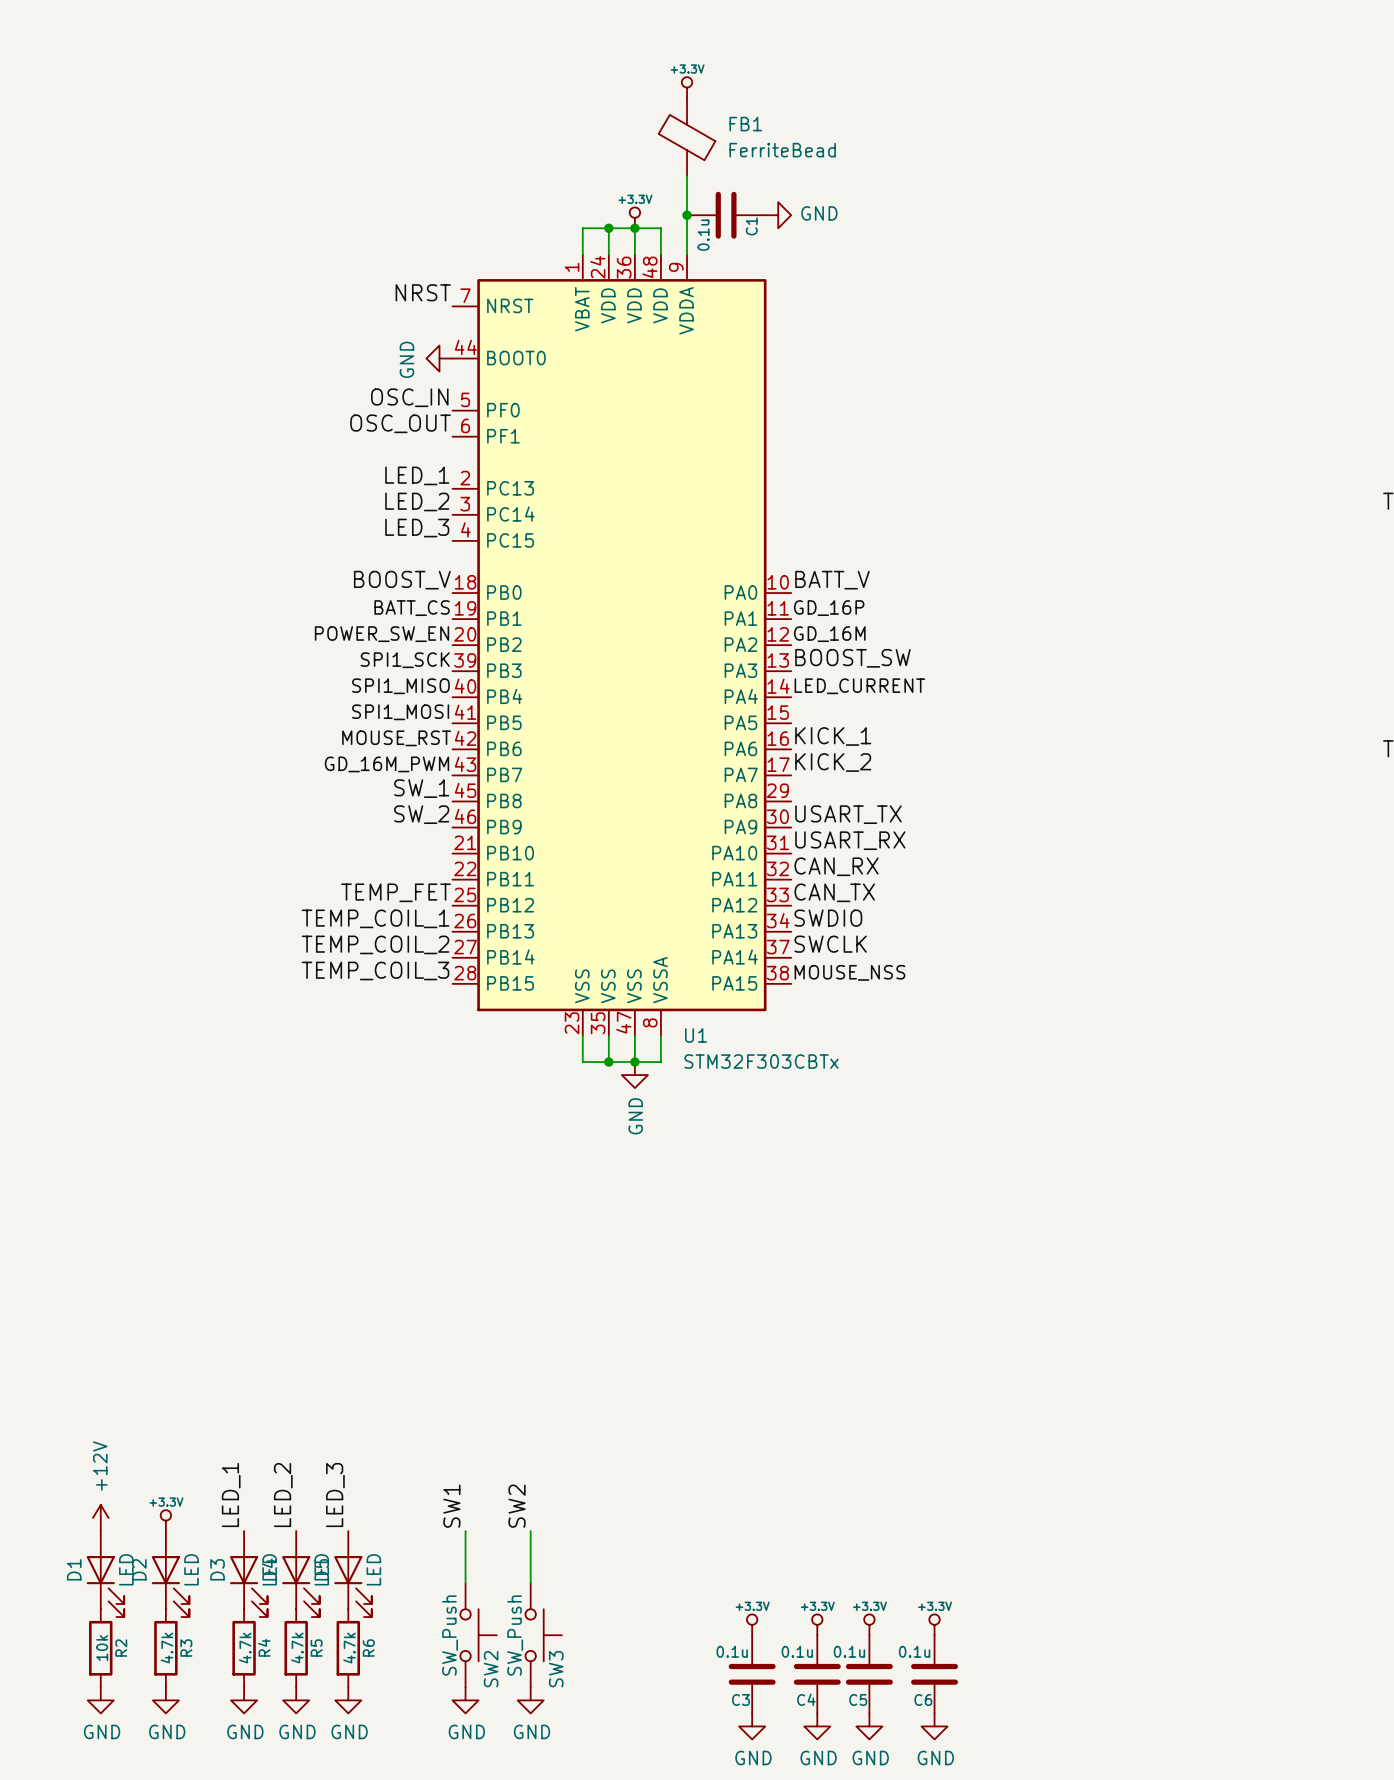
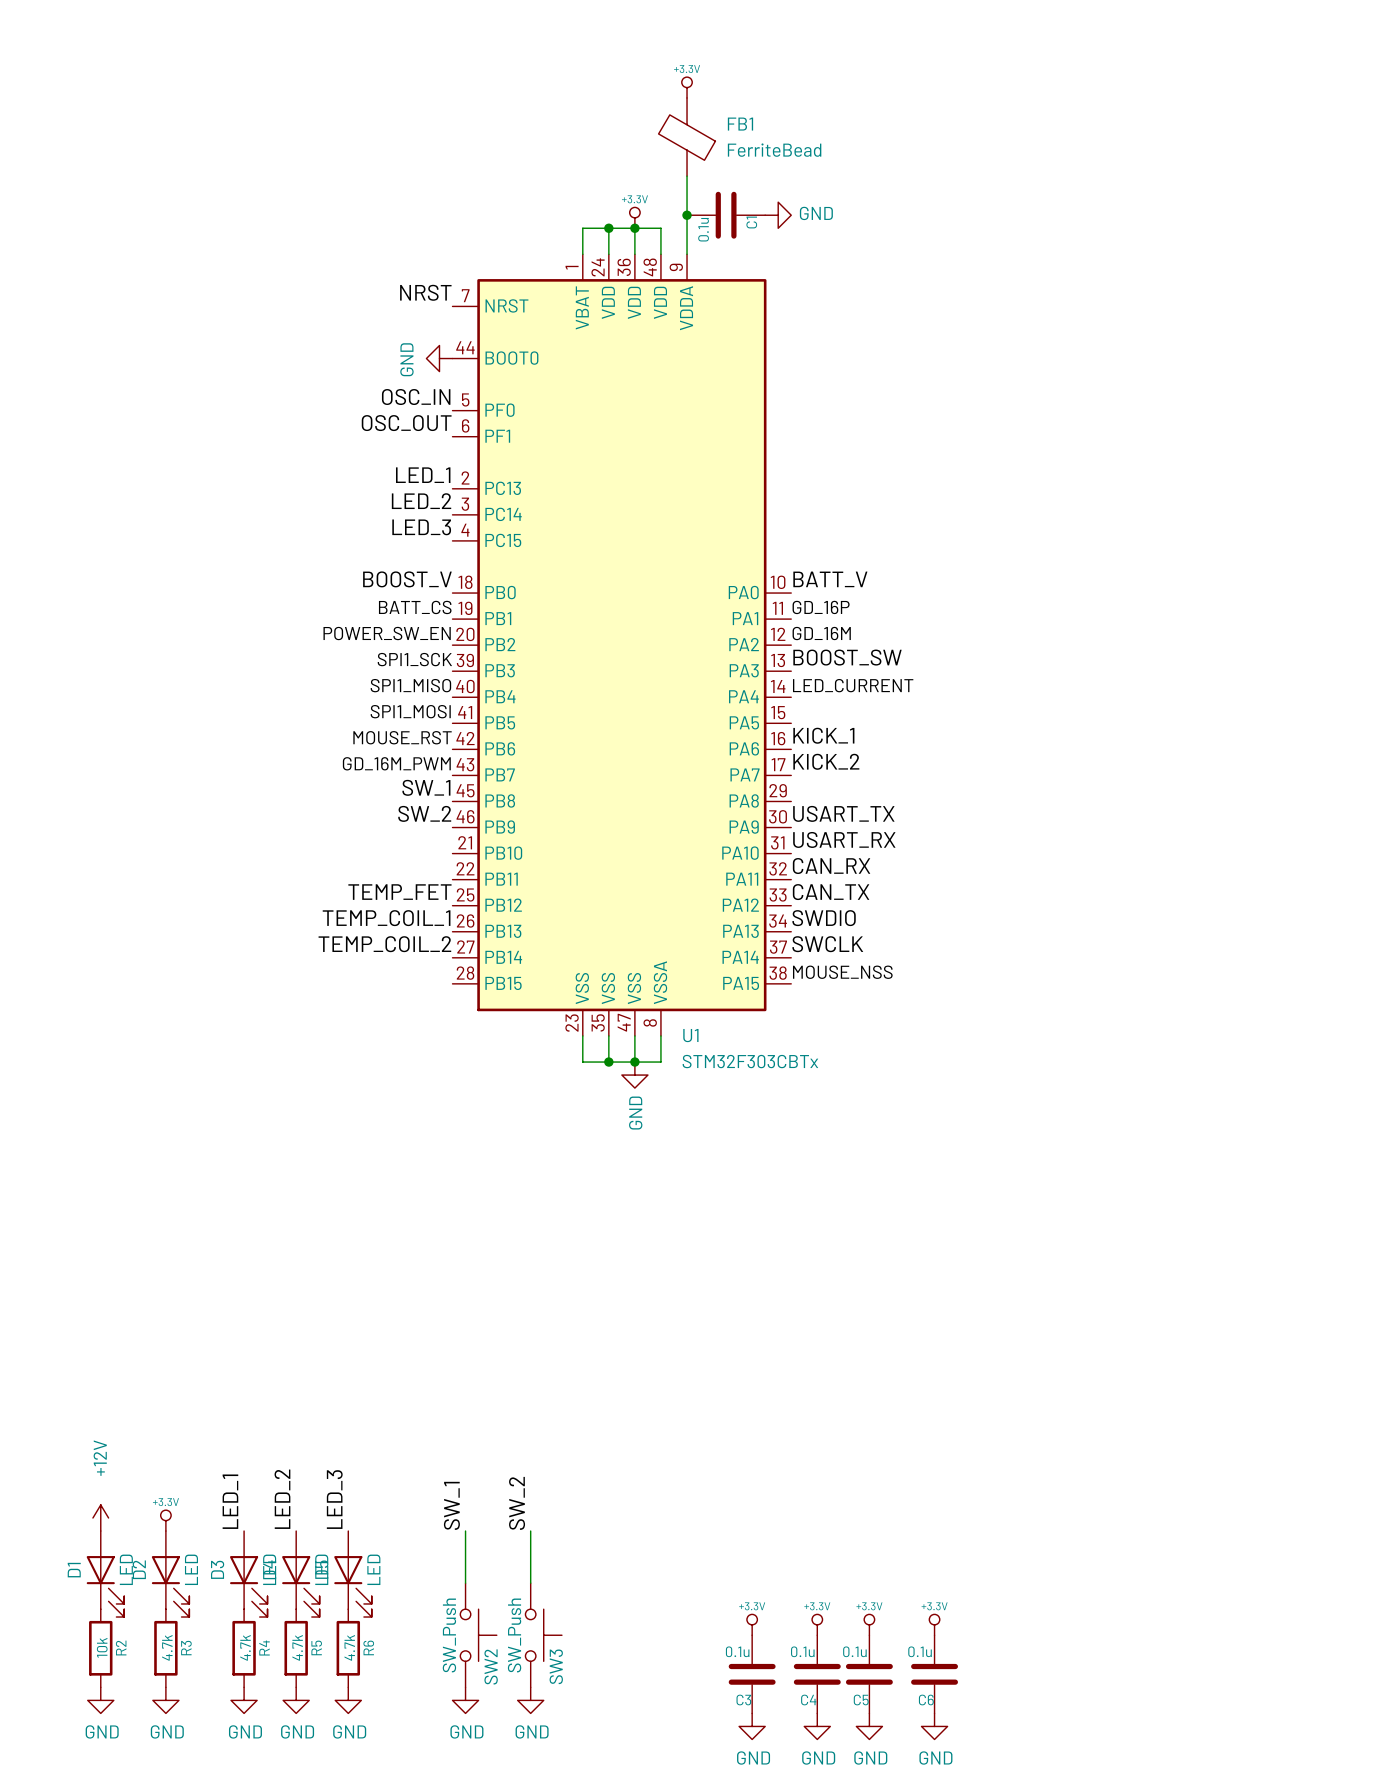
label: TEMP_COIL_3 (375, 970) -> none
label: SW1 (451, 1506) -> SW_1 (451, 1505)
label: SW2 (517, 1506) -> SW_2 (517, 1503)

